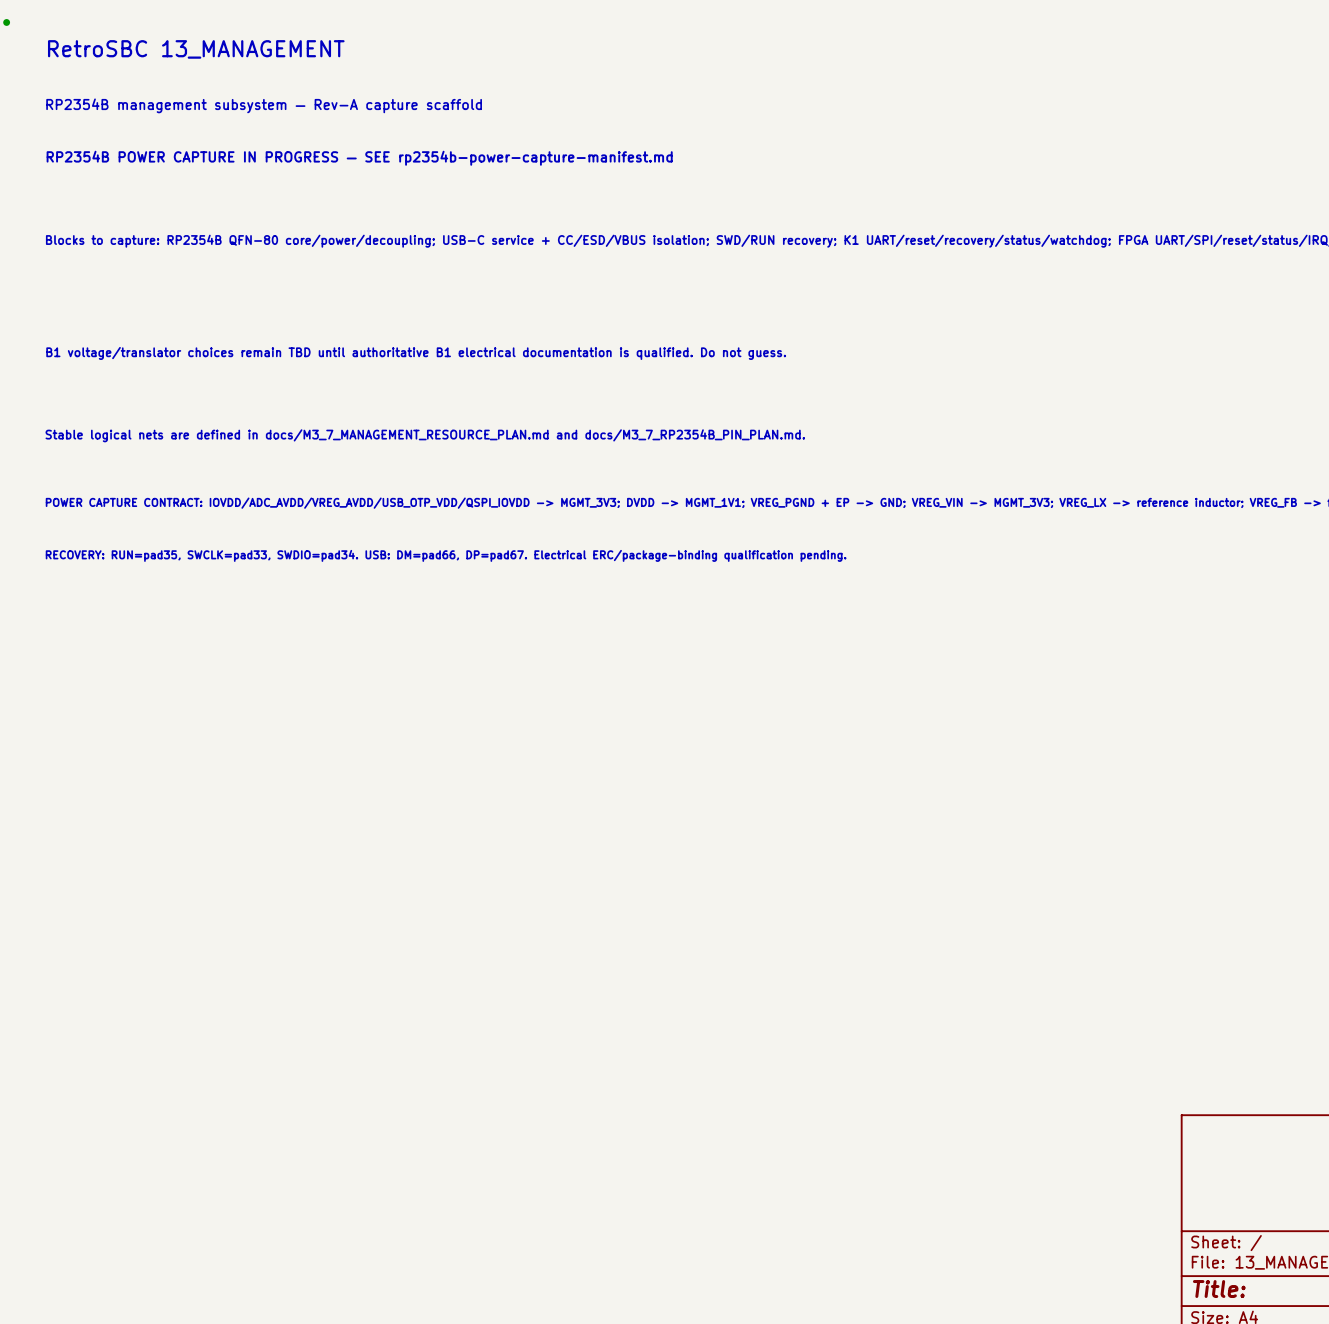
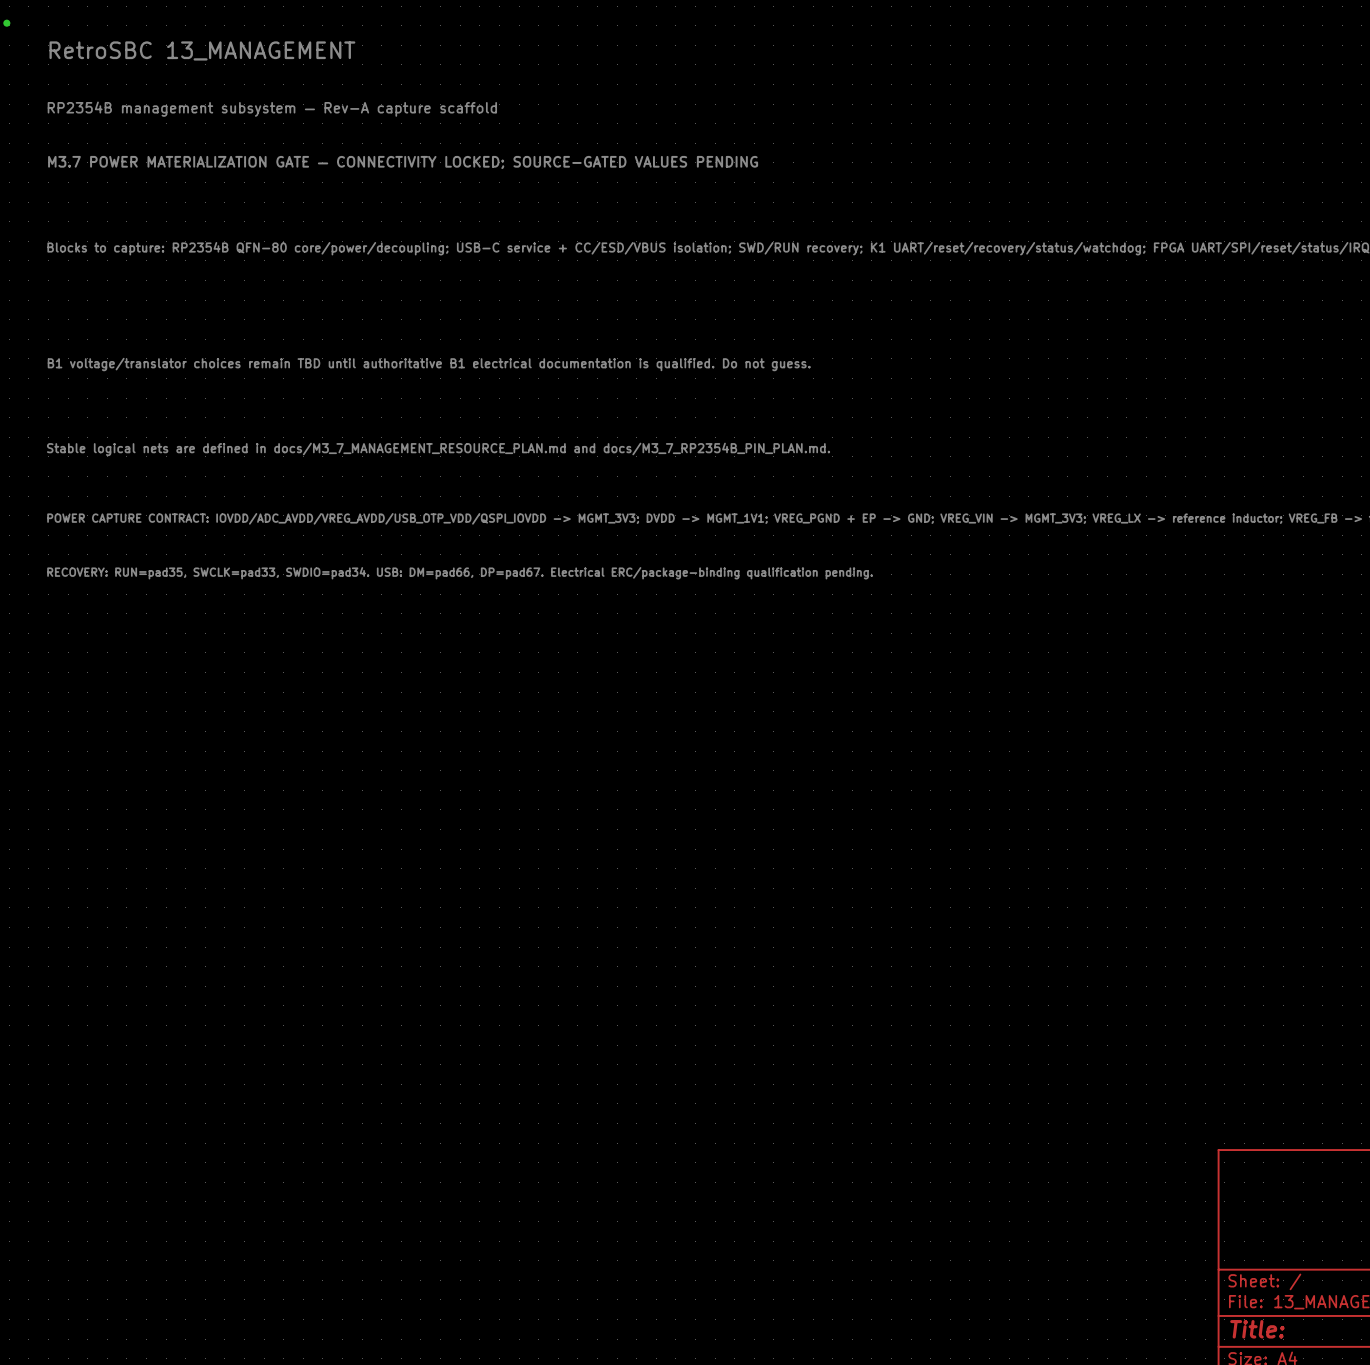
text: RP2354B POWER CAPTURE IN PROGRESS — SEE rp2354b-power-capture-manifest.md (359, 158) -> M3.7 POWER MATERIALIZATION GATE — CONNECTIVITY LOCKED; SOURCE-GATED VALUES PENDING (403, 162)

